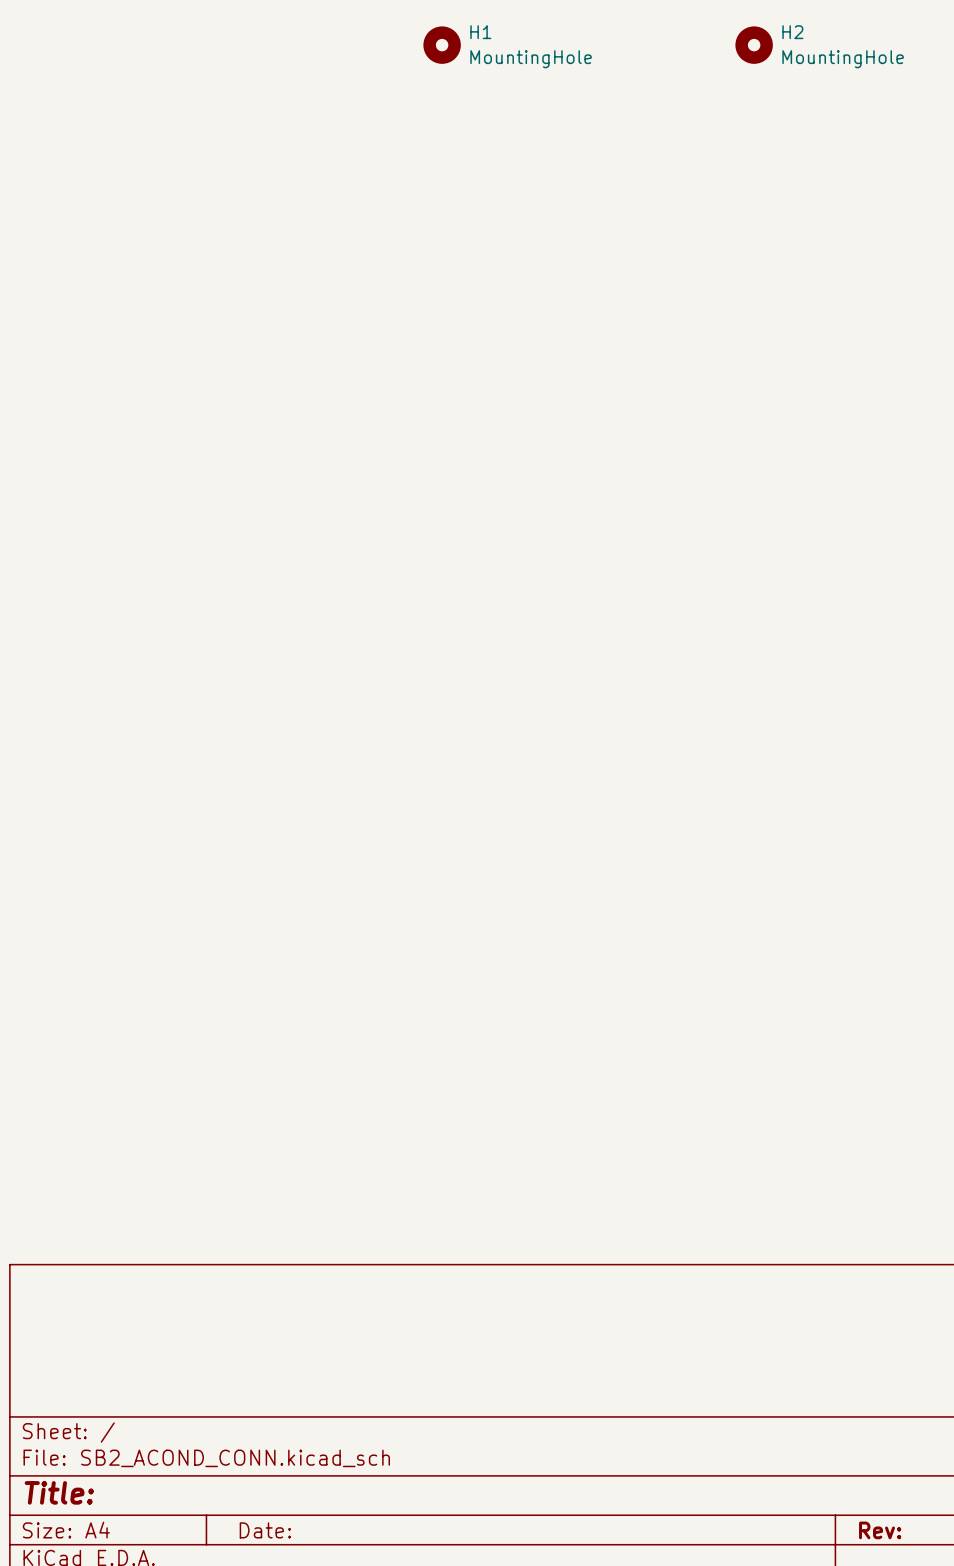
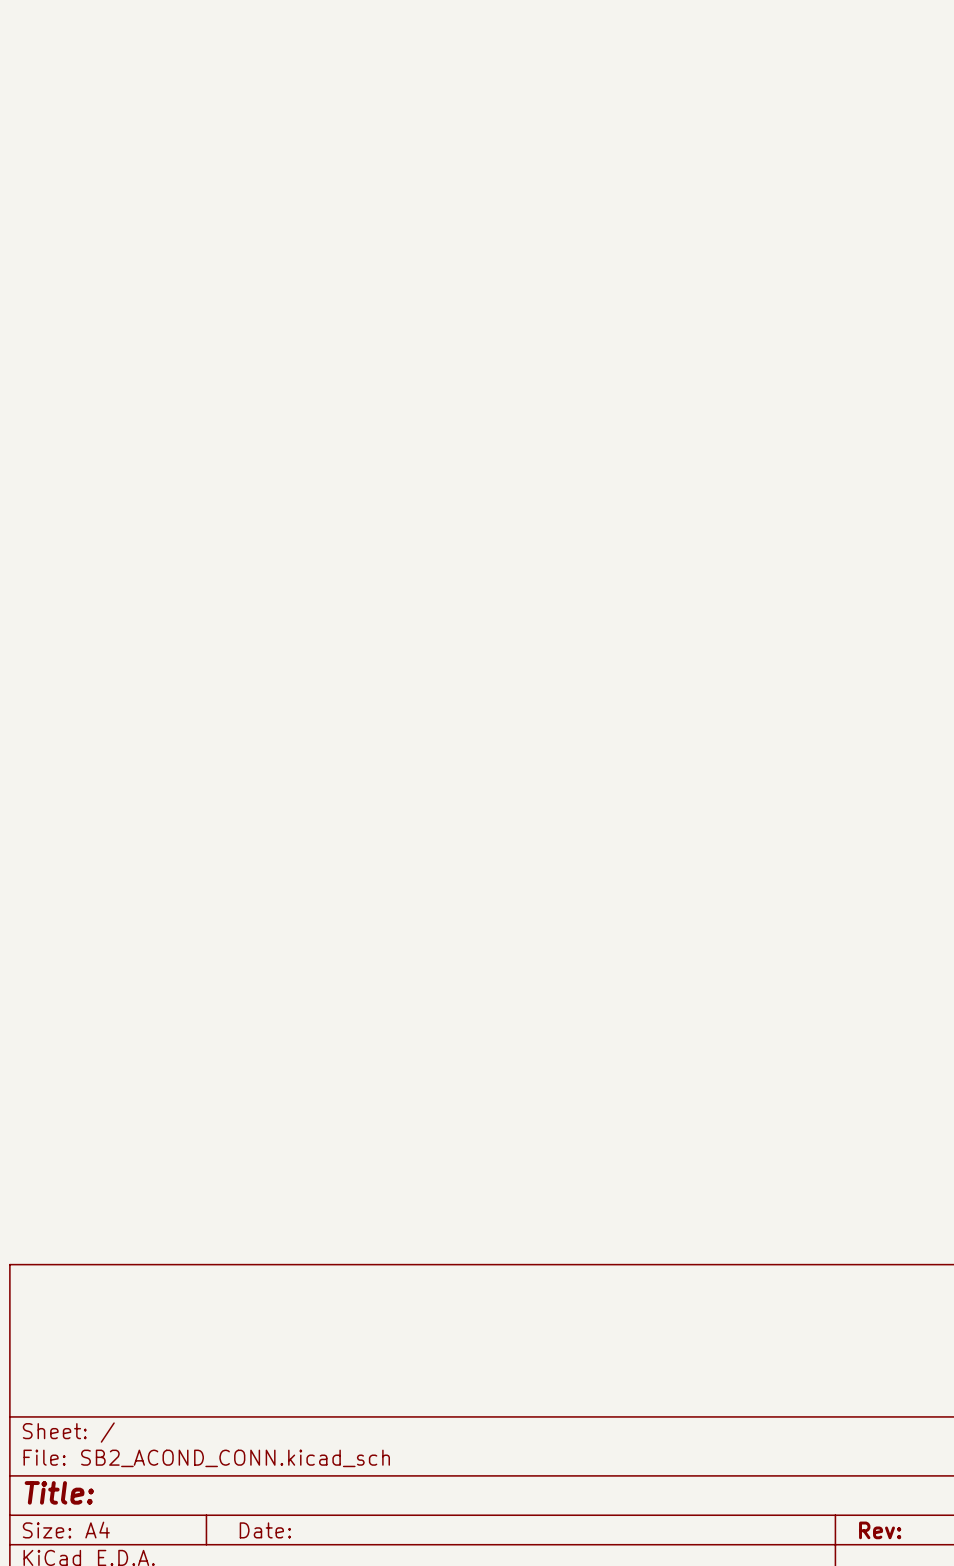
H1: MountingHole (442, 45) -> none
H2: MountingHole (754, 45) -> none

